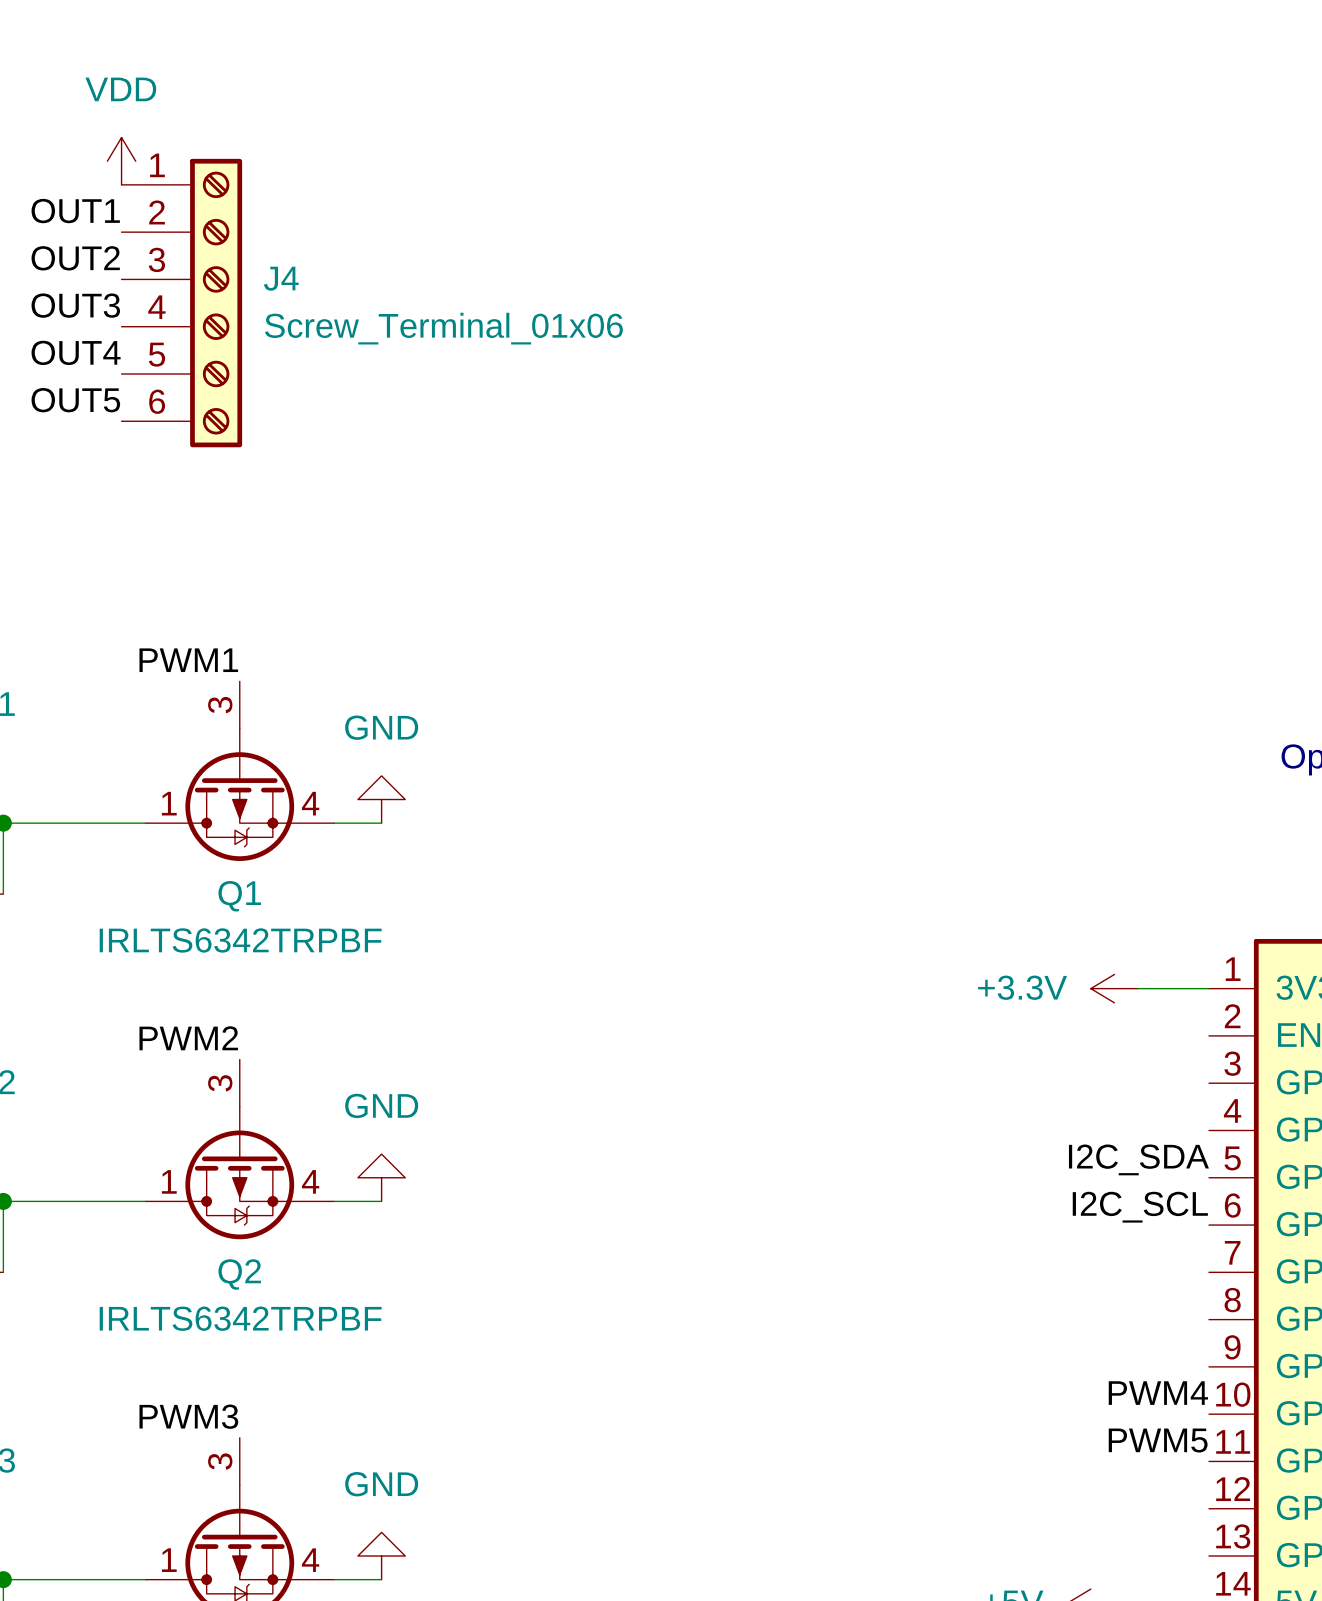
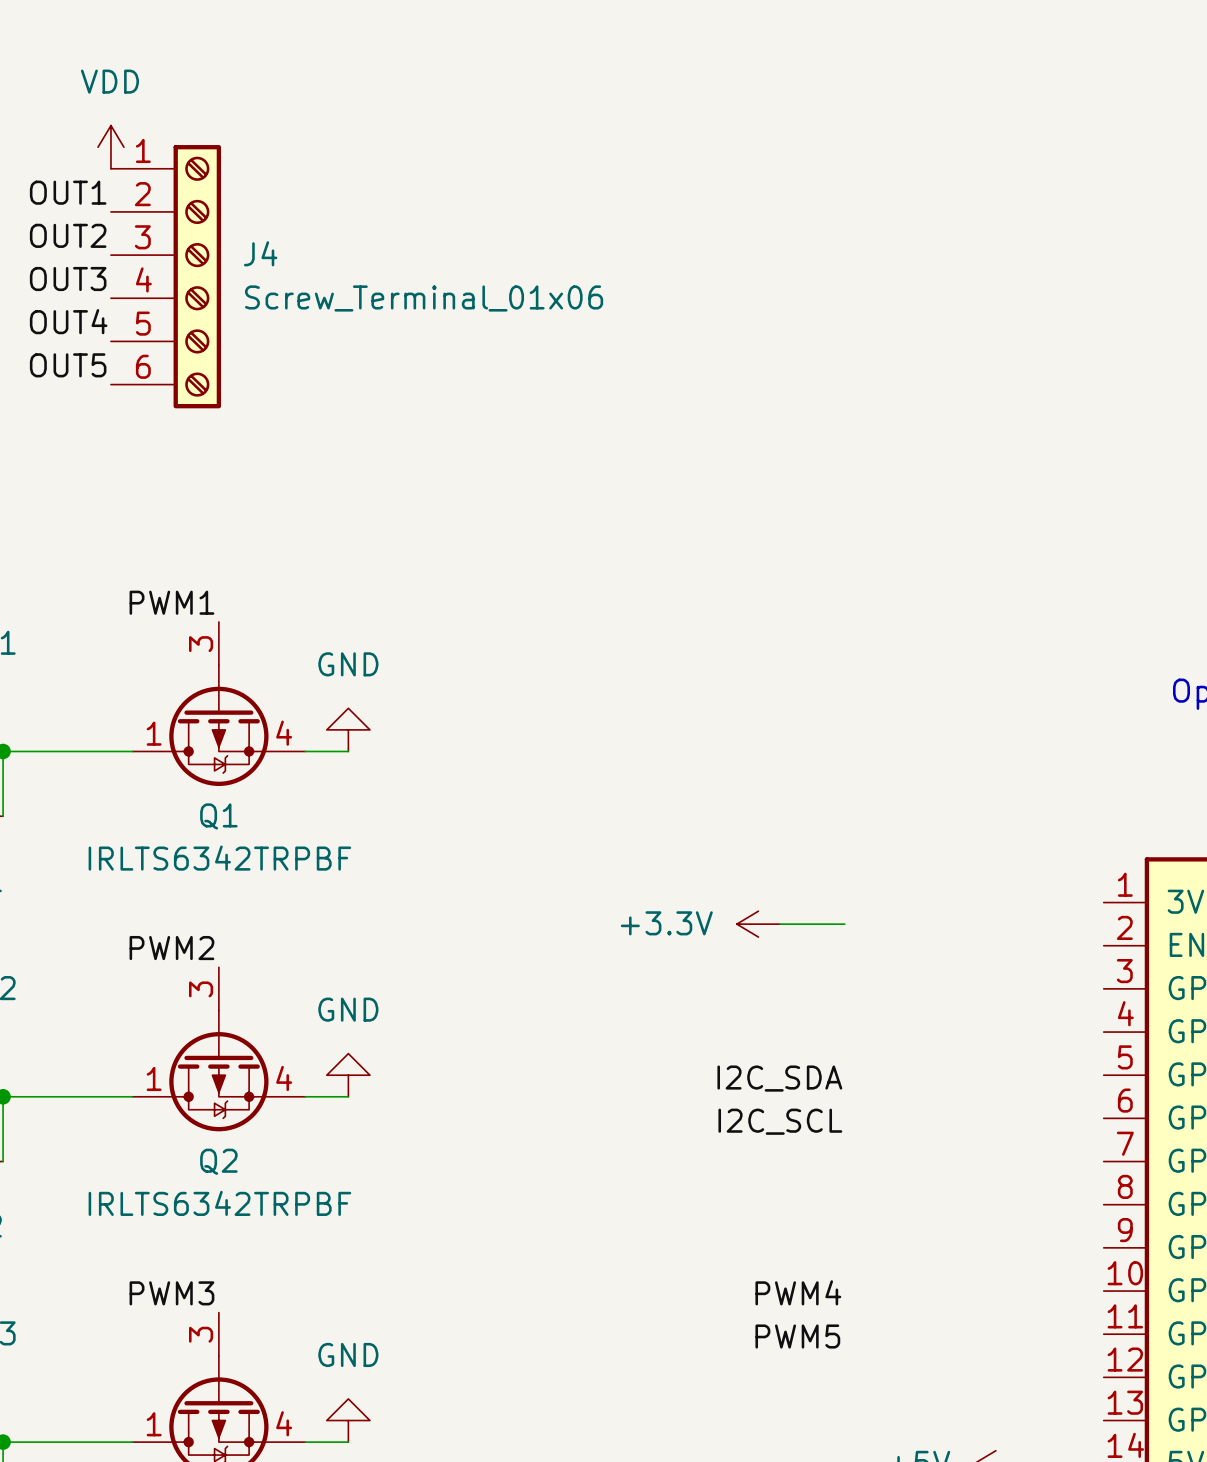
power symbol position: +3.3V (1114, 988) -> +3.3V (758, 924)
wire: (1138, 988) (1209, 988) -> (780, 924) (844, 924)
label position: I2C_SDA (1138, 1159) -> I2C_SDA (779, 1078)
label position: I2C_SCL (1140, 1207) -> I2C_SCL (780, 1121)
label position: PWM4 (1158, 1393) -> PWM4 (798, 1292)
label position: PWM5 (1158, 1440) -> PWM5 (797, 1336)

